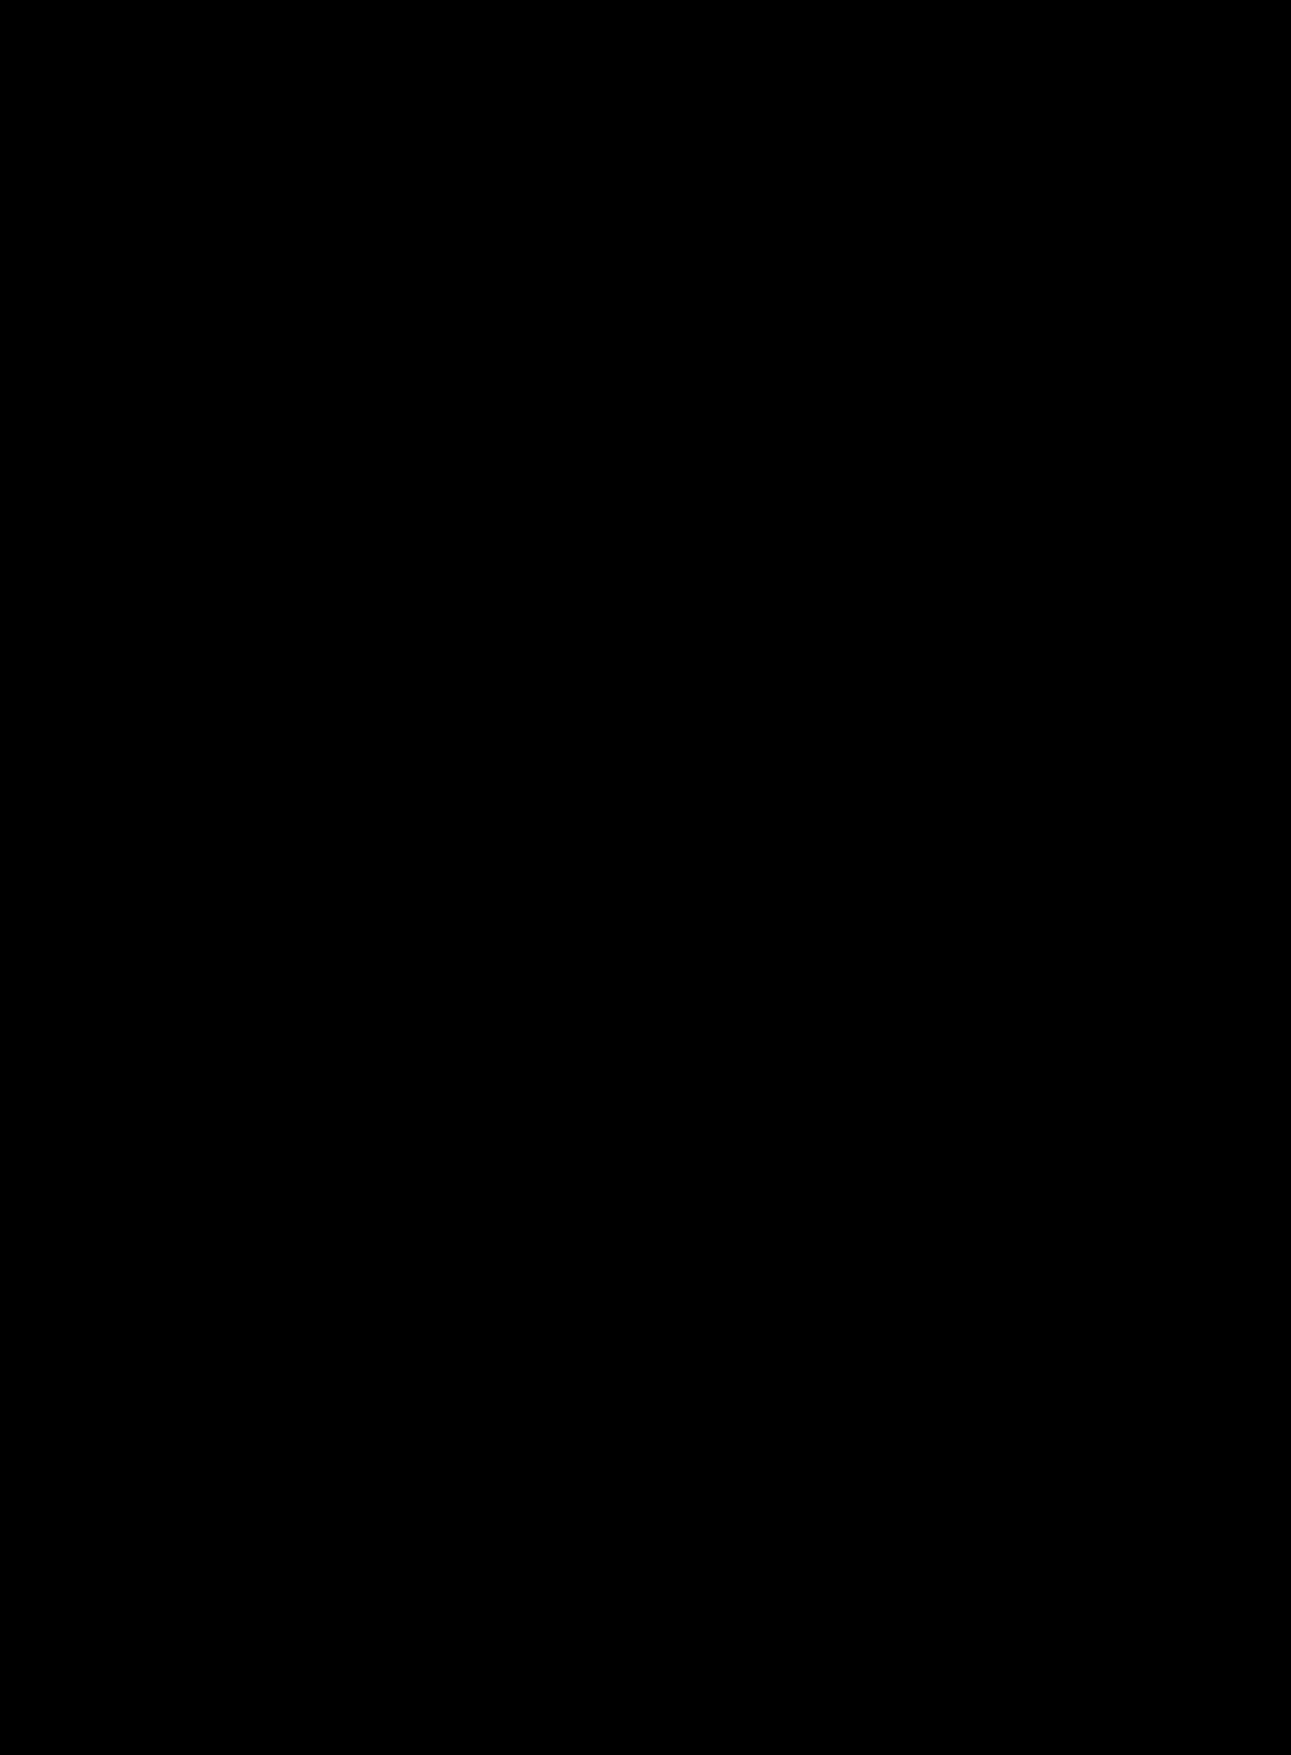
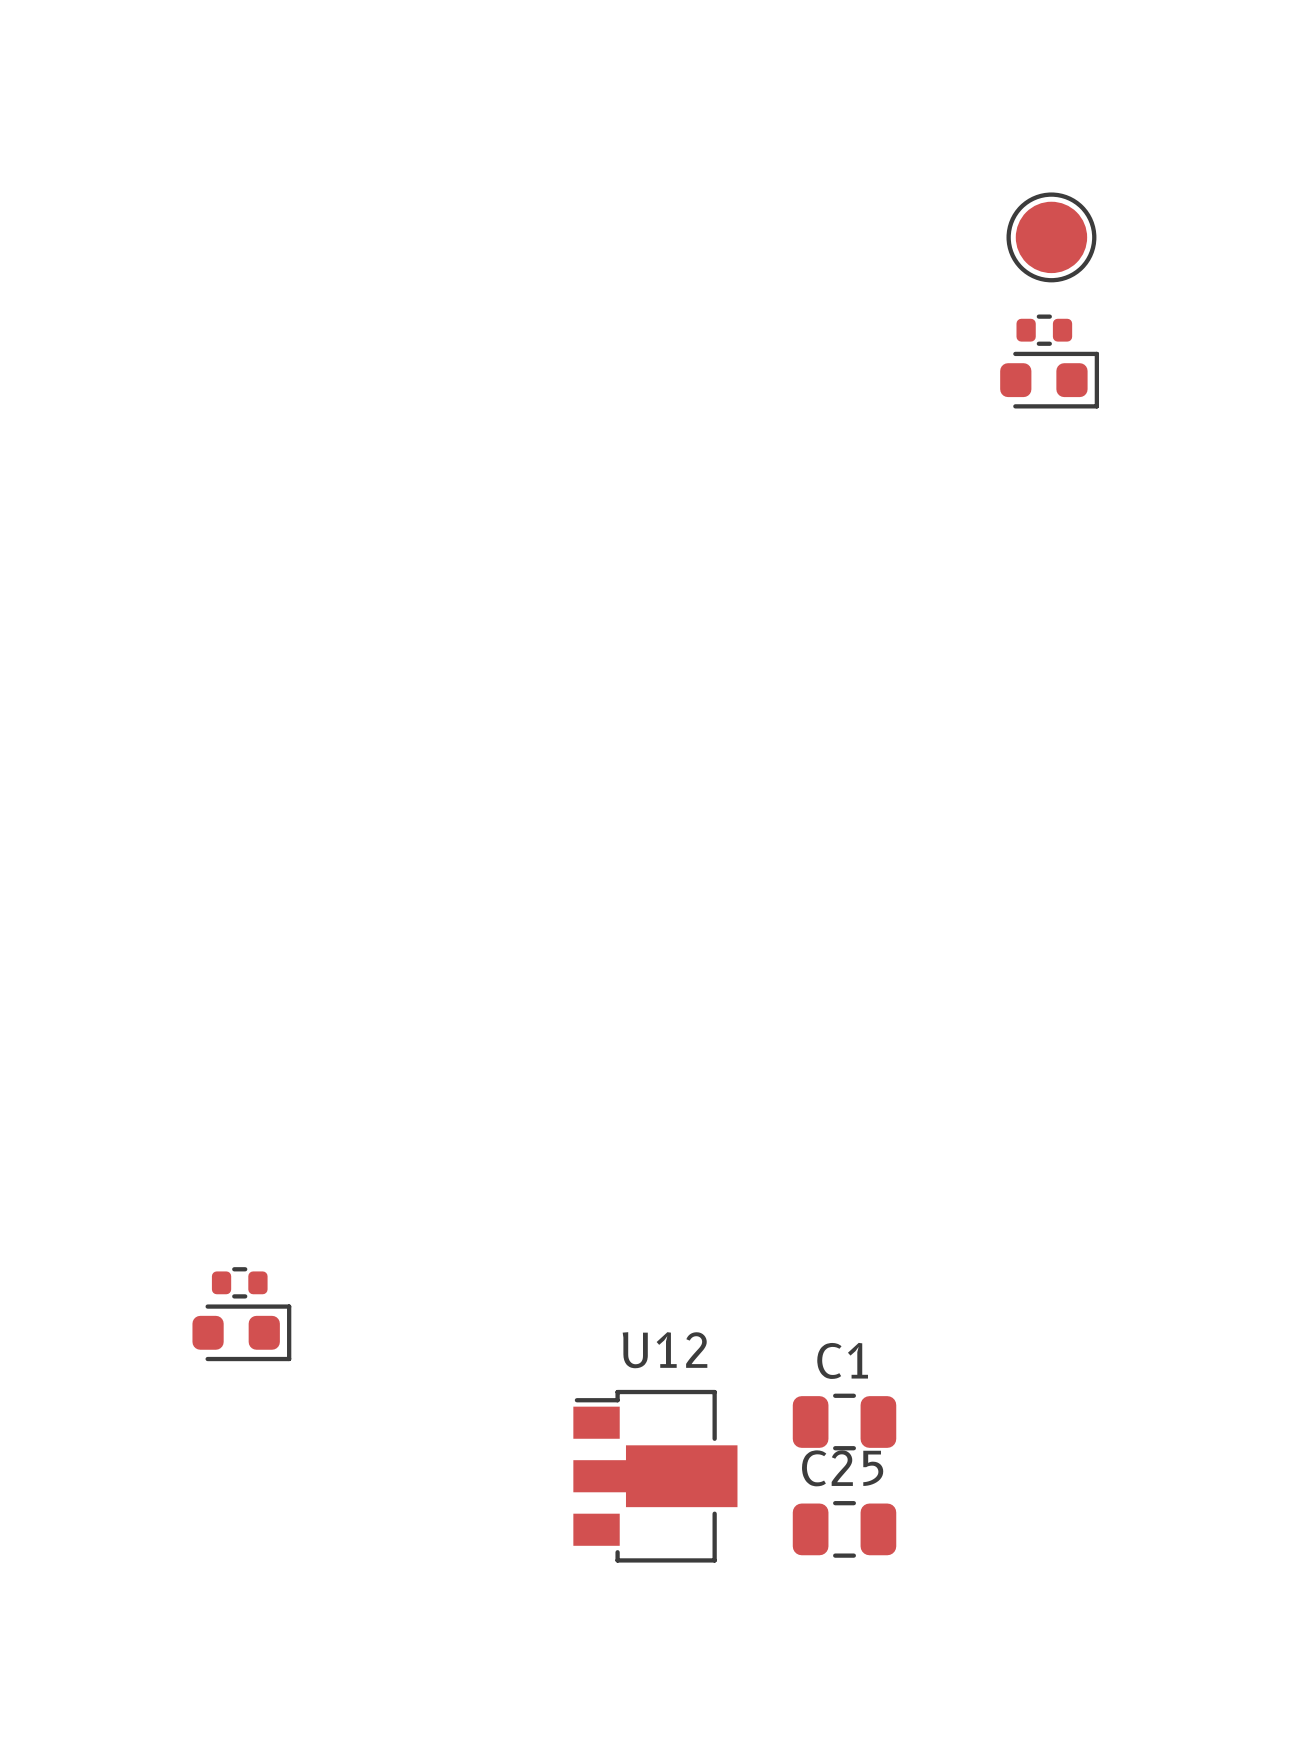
part: none -> (1051, 237)
part: none -> (1044, 330)
part: none -> (1049, 380)
part: none -> (239, 1282)
part: none -> (241, 1332)
C1: none -> (844, 1421)
U12: none -> (655, 1476)
C25: none -> (844, 1529)

